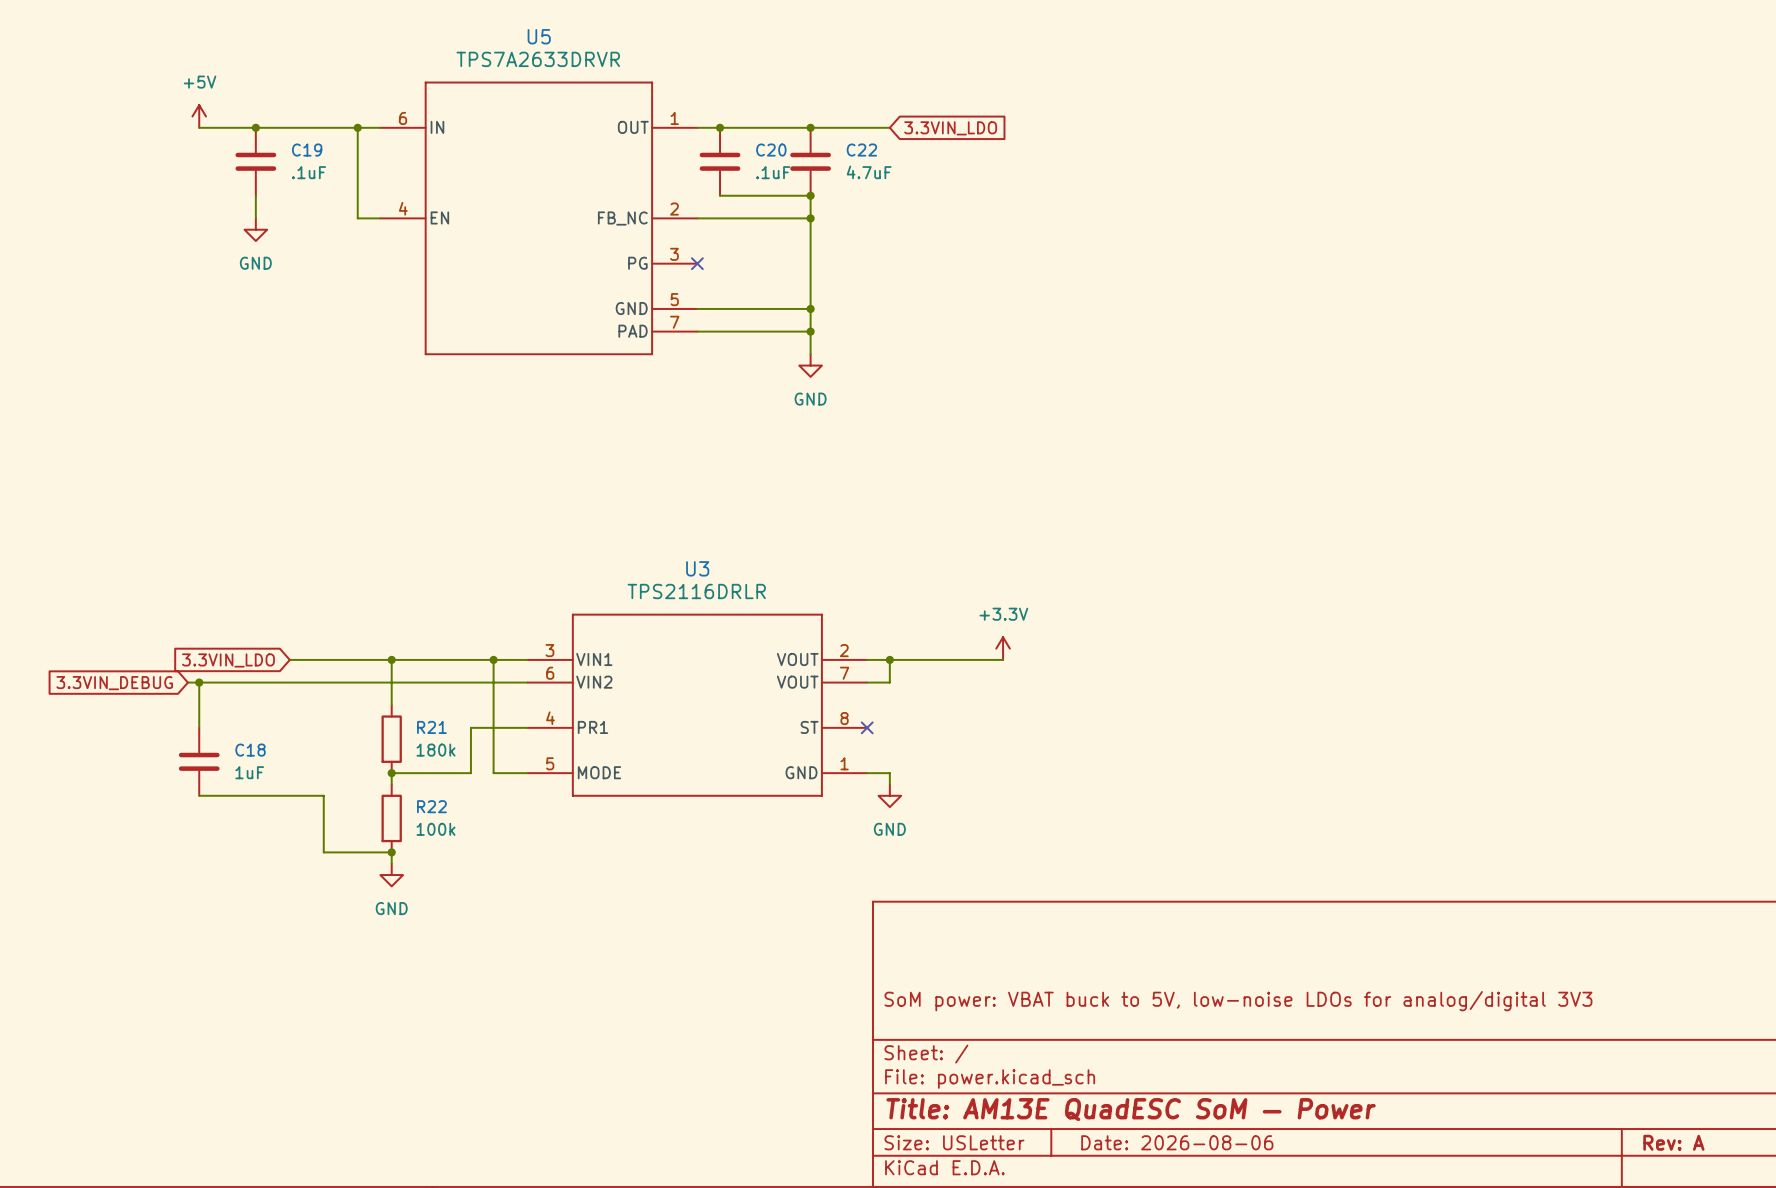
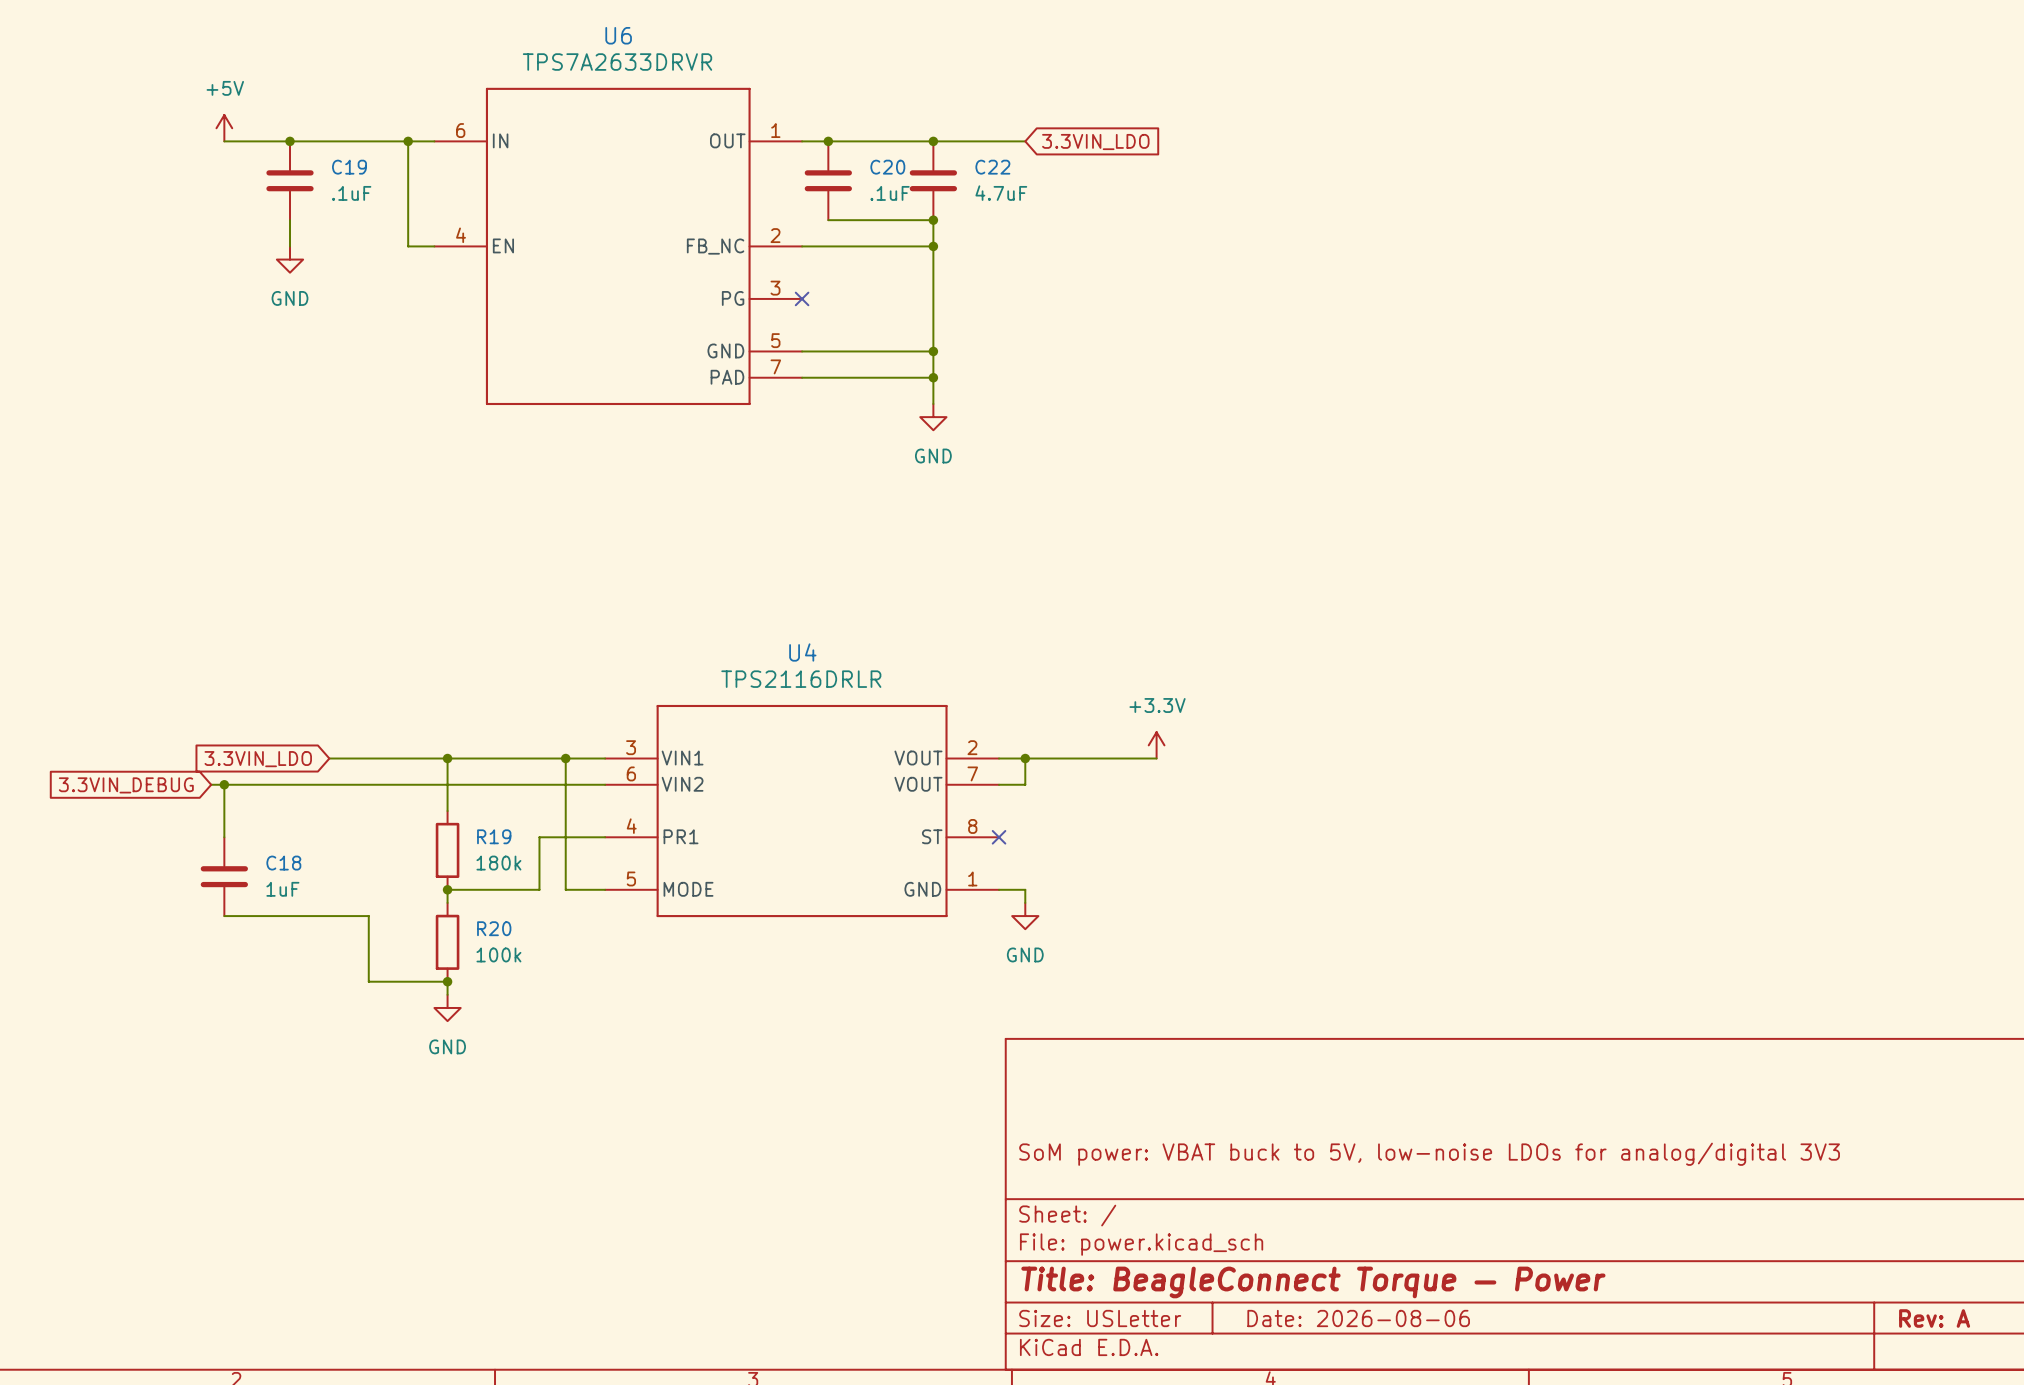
U5 name: U5 (539, 36) -> U6 (618, 35)
U3 name: U3 (697, 568) -> U4 (802, 652)
R21 name: R21 (431, 727) -> R19 (494, 836)
R22 name: R22 (431, 806) -> R20 (494, 928)
title block: Title: AM13E QuadESC SoM — Power (1131, 1109) -> Title: BeagleConnect Torque — Power (1313, 1282)

